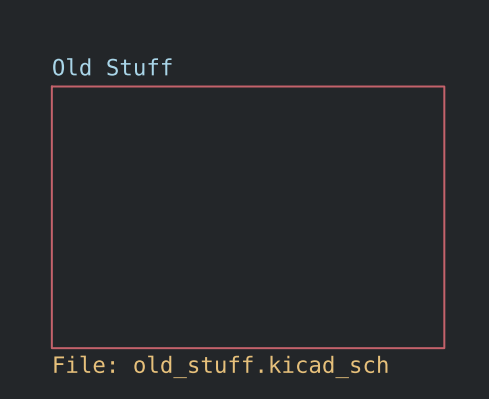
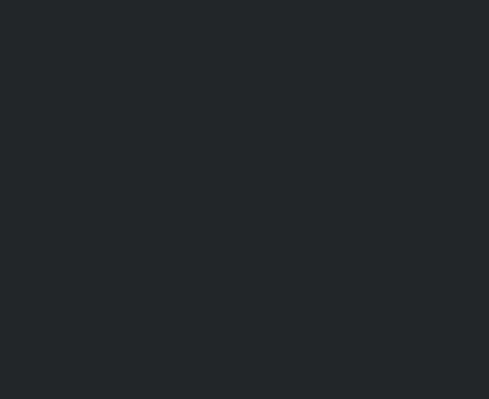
sheet Old Stuff: File: old_stuff.kicad_sch (248, 217) -> none

